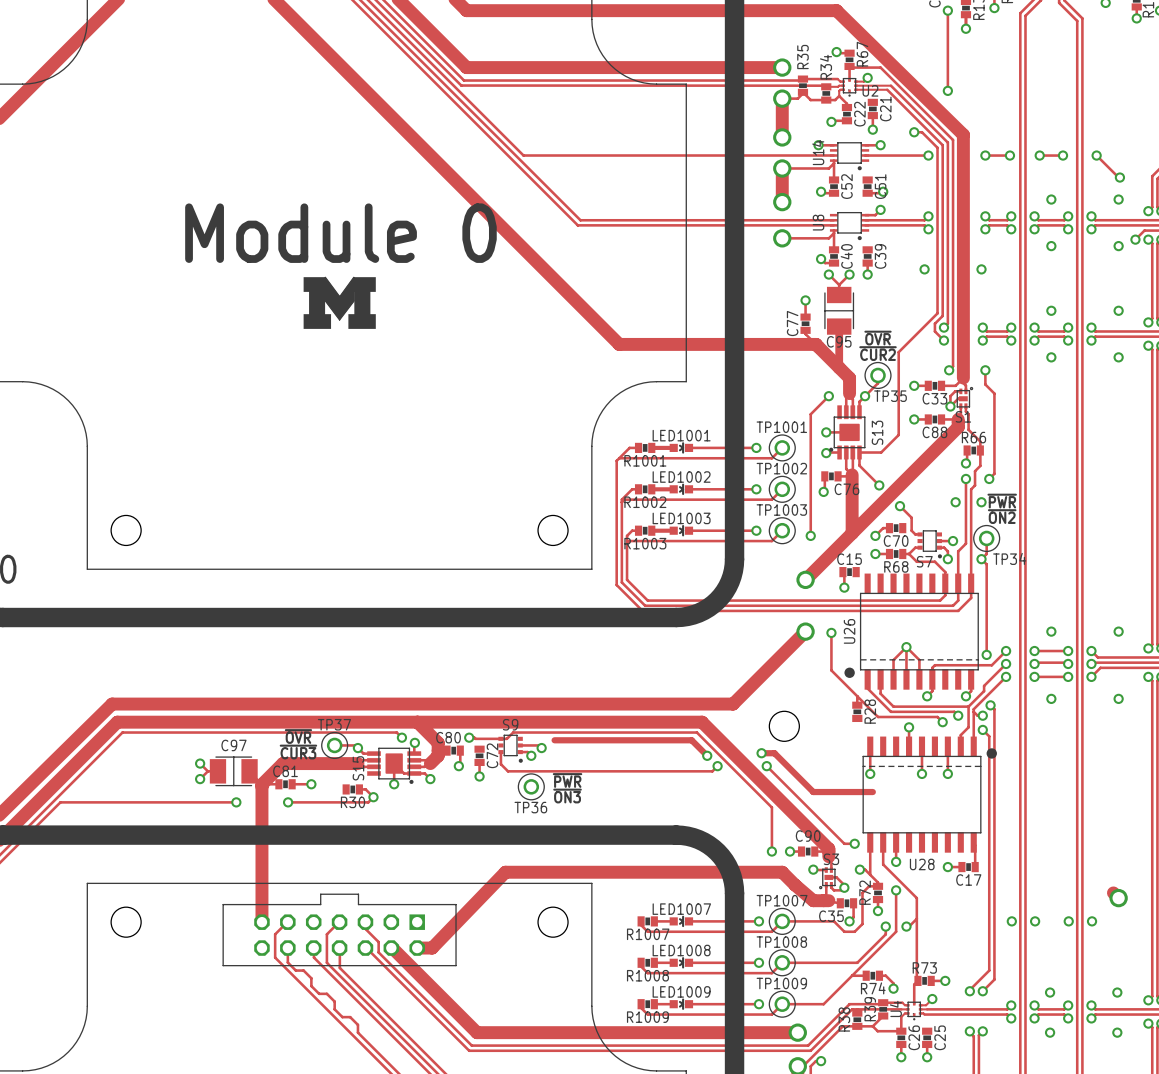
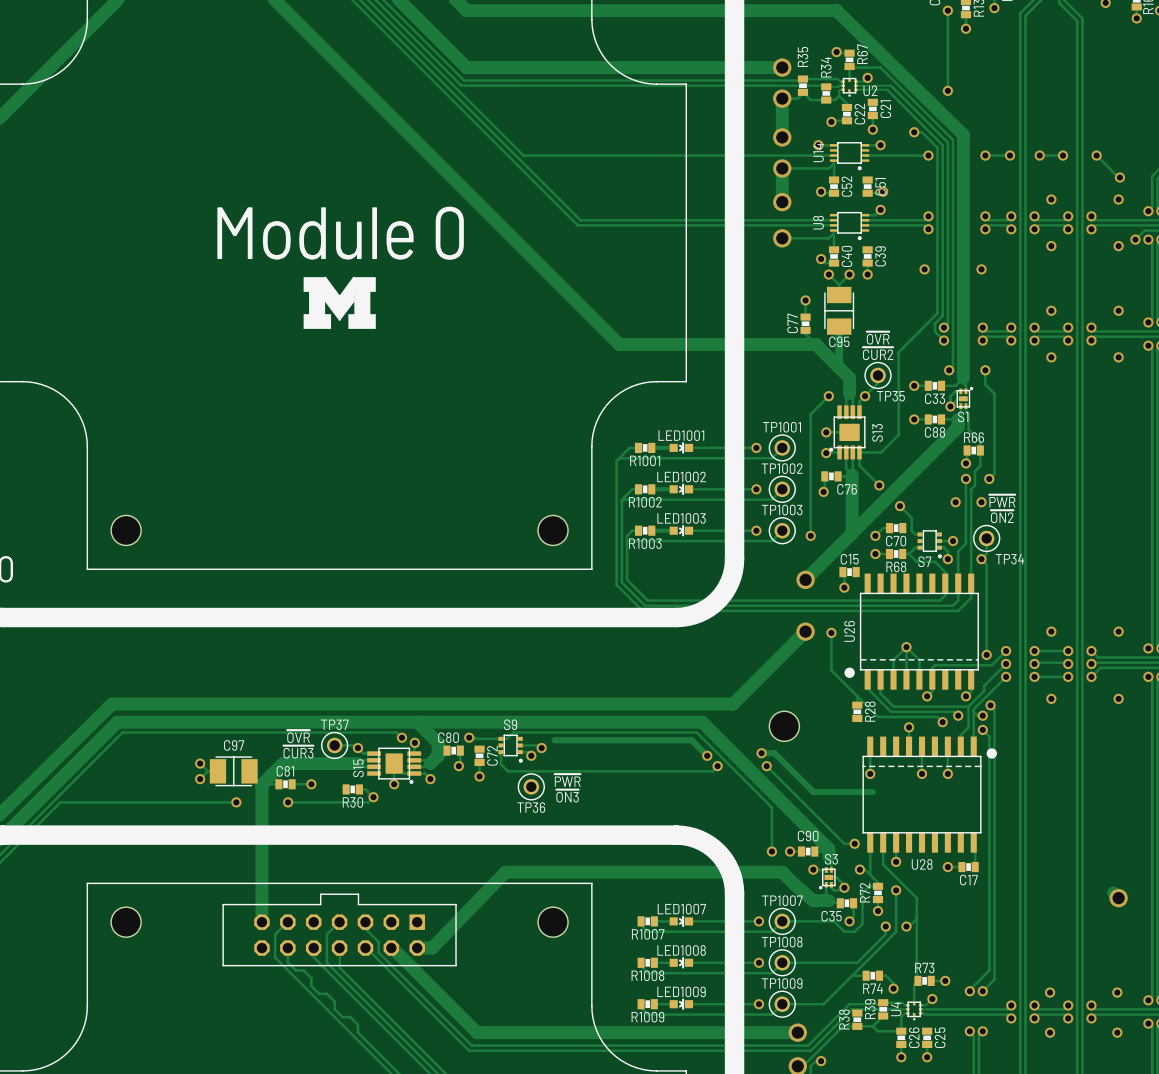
via: (1011, 921) -> none
via: (1035, 921) -> none
via: (1068, 921) -> none
via: (1092, 921) -> none

